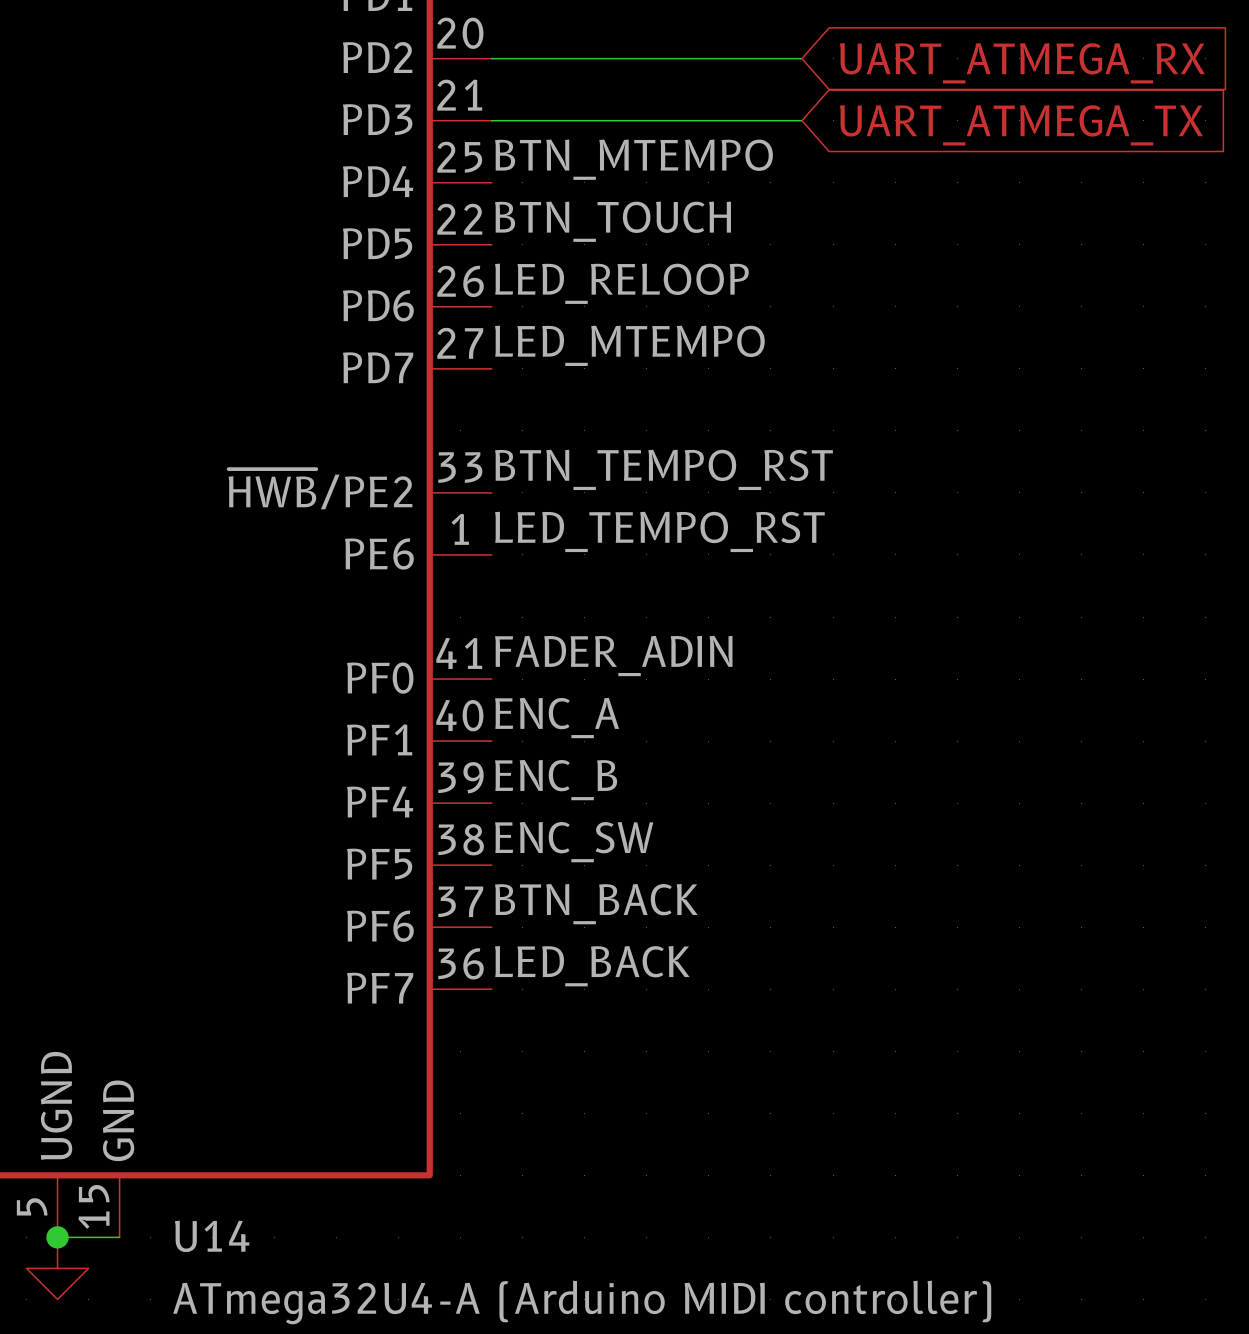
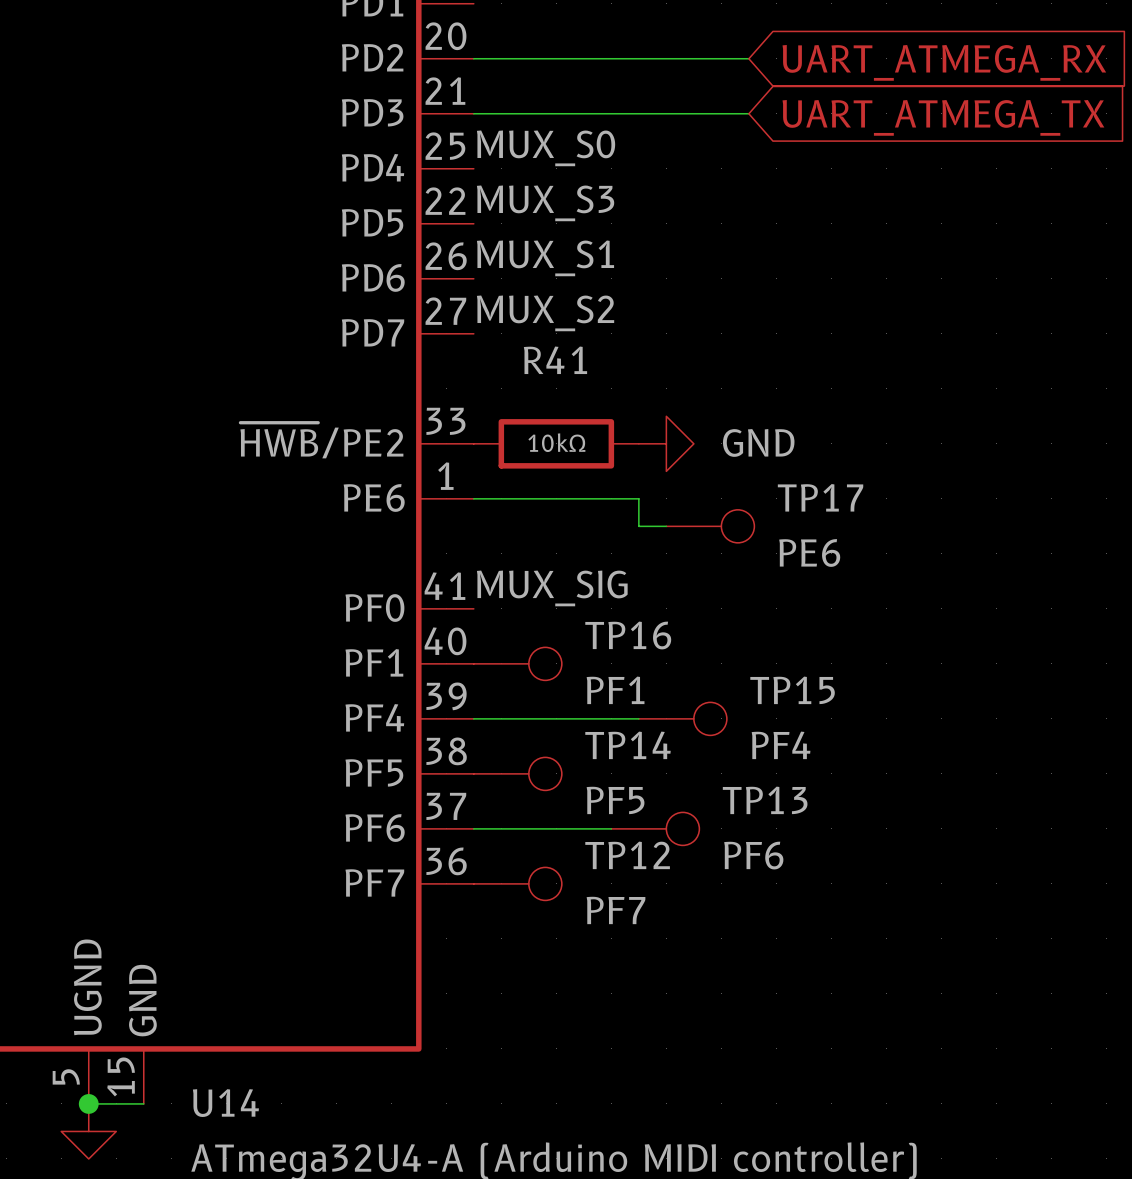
label: BTN_MTEMPO (633, 159) -> MUX_S0 (546, 148)
label: BTN_TOUCH (613, 221) -> MUX_S3 (545, 203)
label: LED_RELOOP (621, 283) -> MUX_S1 (545, 258)
label: LED_MTEMPO (629, 345) -> MUX_S2 (545, 313)
label: BTN_TEMPO_RST (663, 469) -> none
R41: none -> 10kΩ (556, 443)
power symbol: none -> GND (666, 443)
label: LED_TEMPO_RST (659, 531) -> none
wire: none -> (473, 498) (638, 498) (638, 526) (666, 526)
TP17: none -> PE6 (710, 526)
label: FADER_ADIN (613, 656) -> MUX_SIG (552, 588)
label: ENC_A (557, 718) -> none
TP16: none -> PF1 (517, 663)
label: ENC_B (556, 780) -> none
wire: none -> (473, 718) (638, 718)
TP15: none -> PF4 (682, 718)
label: ENC_SW (574, 842) -> none
TP14: none -> PF5 (517, 773)
label: BTN_BACK (596, 904) -> none
wire: none -> (473, 828) (611, 828)
TP13: none -> PF6 (655, 828)
label: LED_BACK (592, 966) -> none
TP12: none -> PF7 (517, 883)

